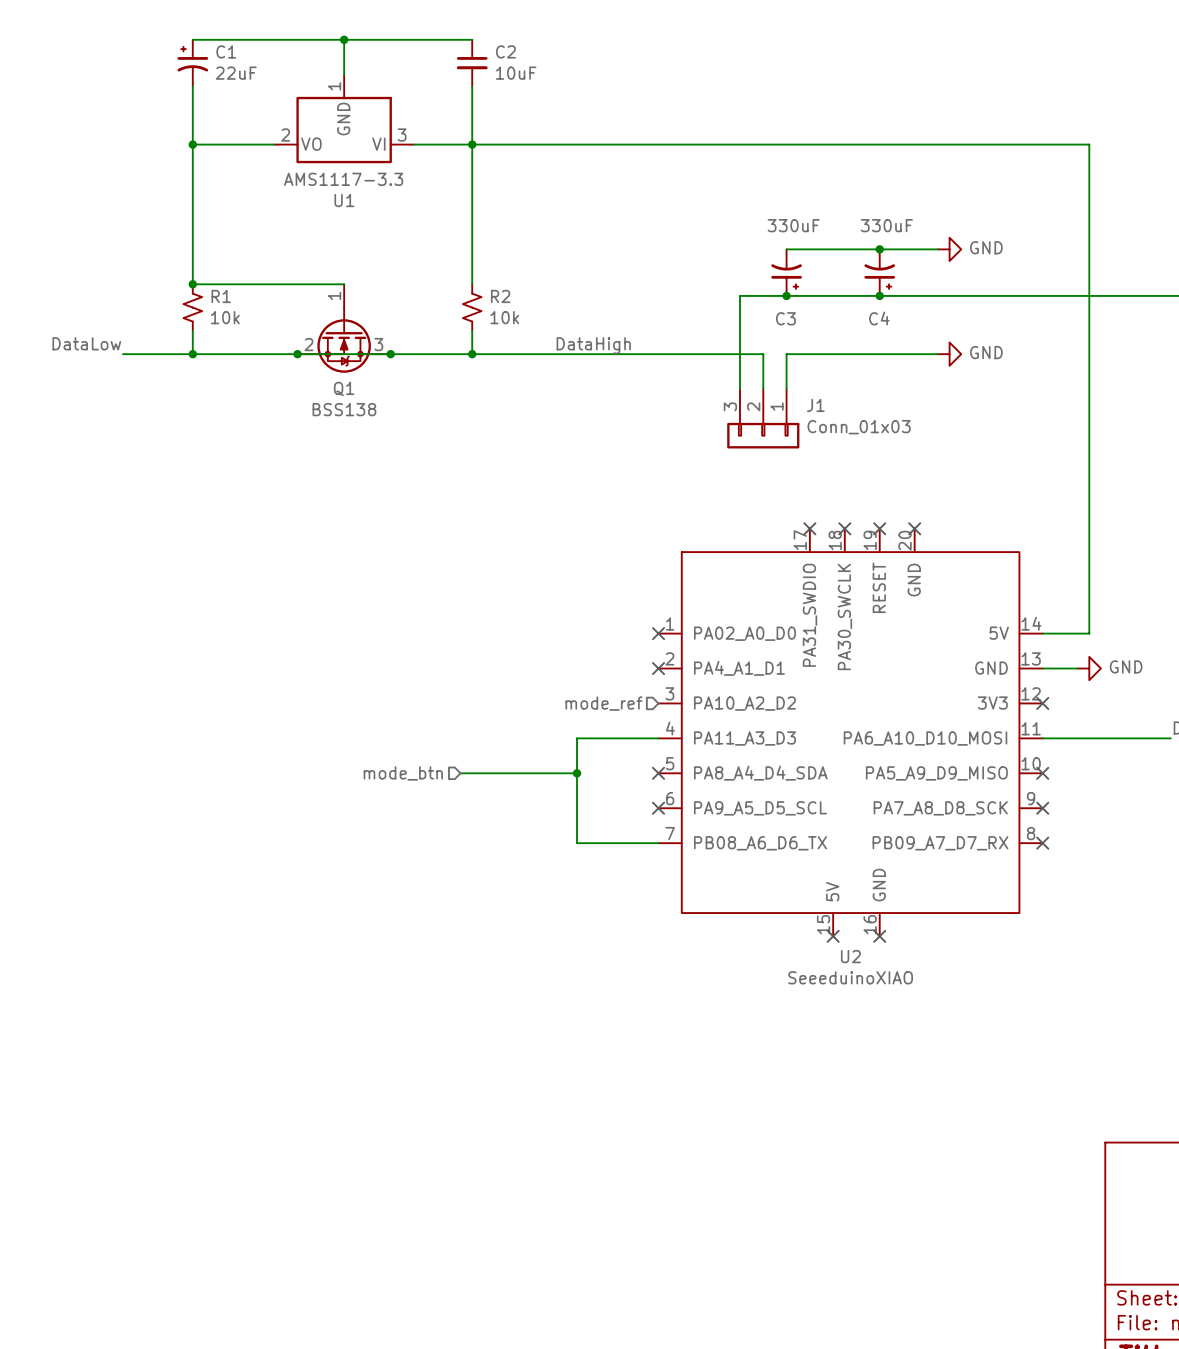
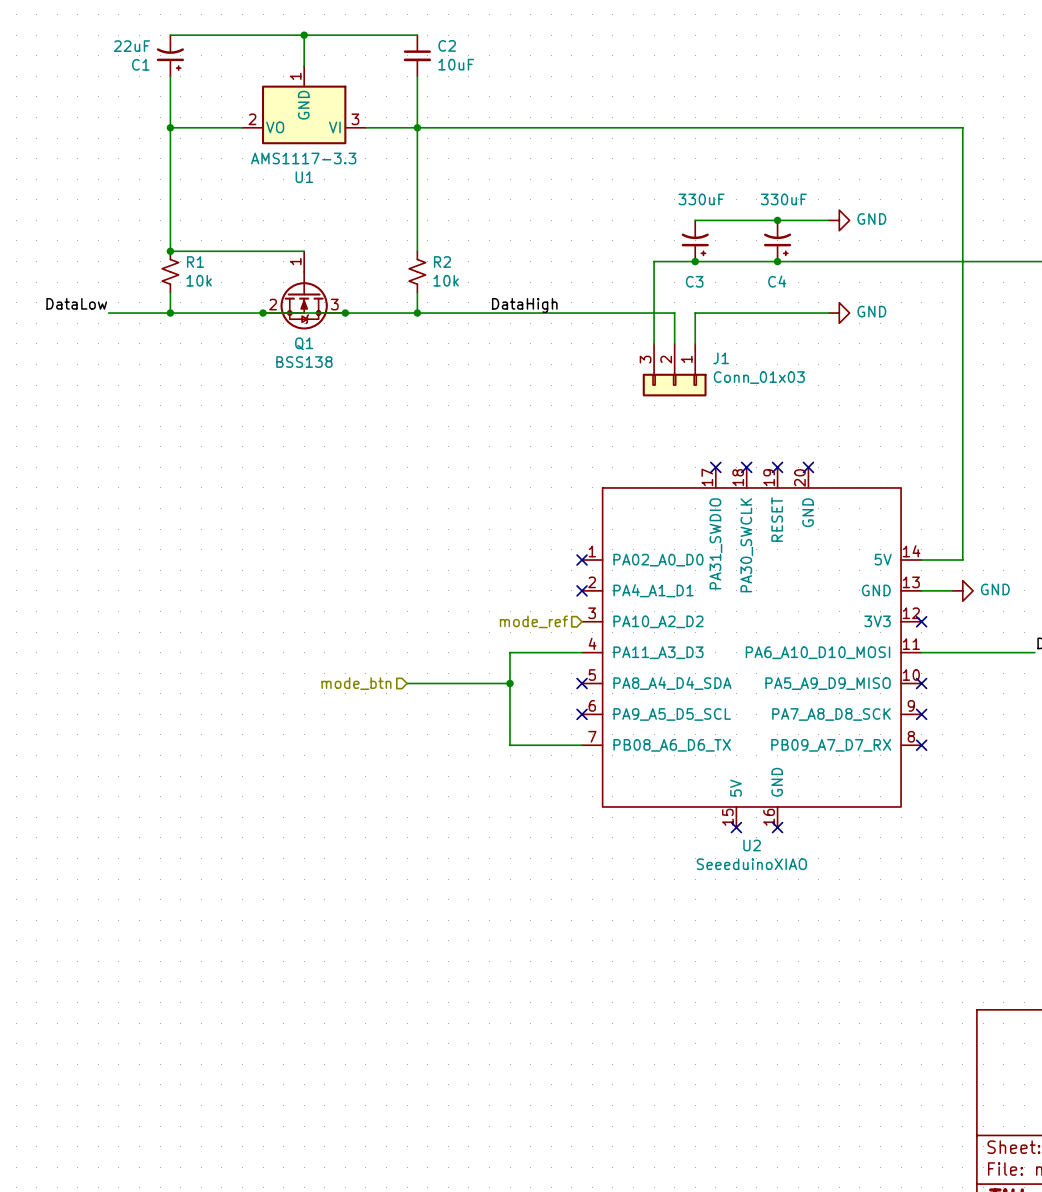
C1 rotation: 0° (192, 59) -> 180° (170, 59)

